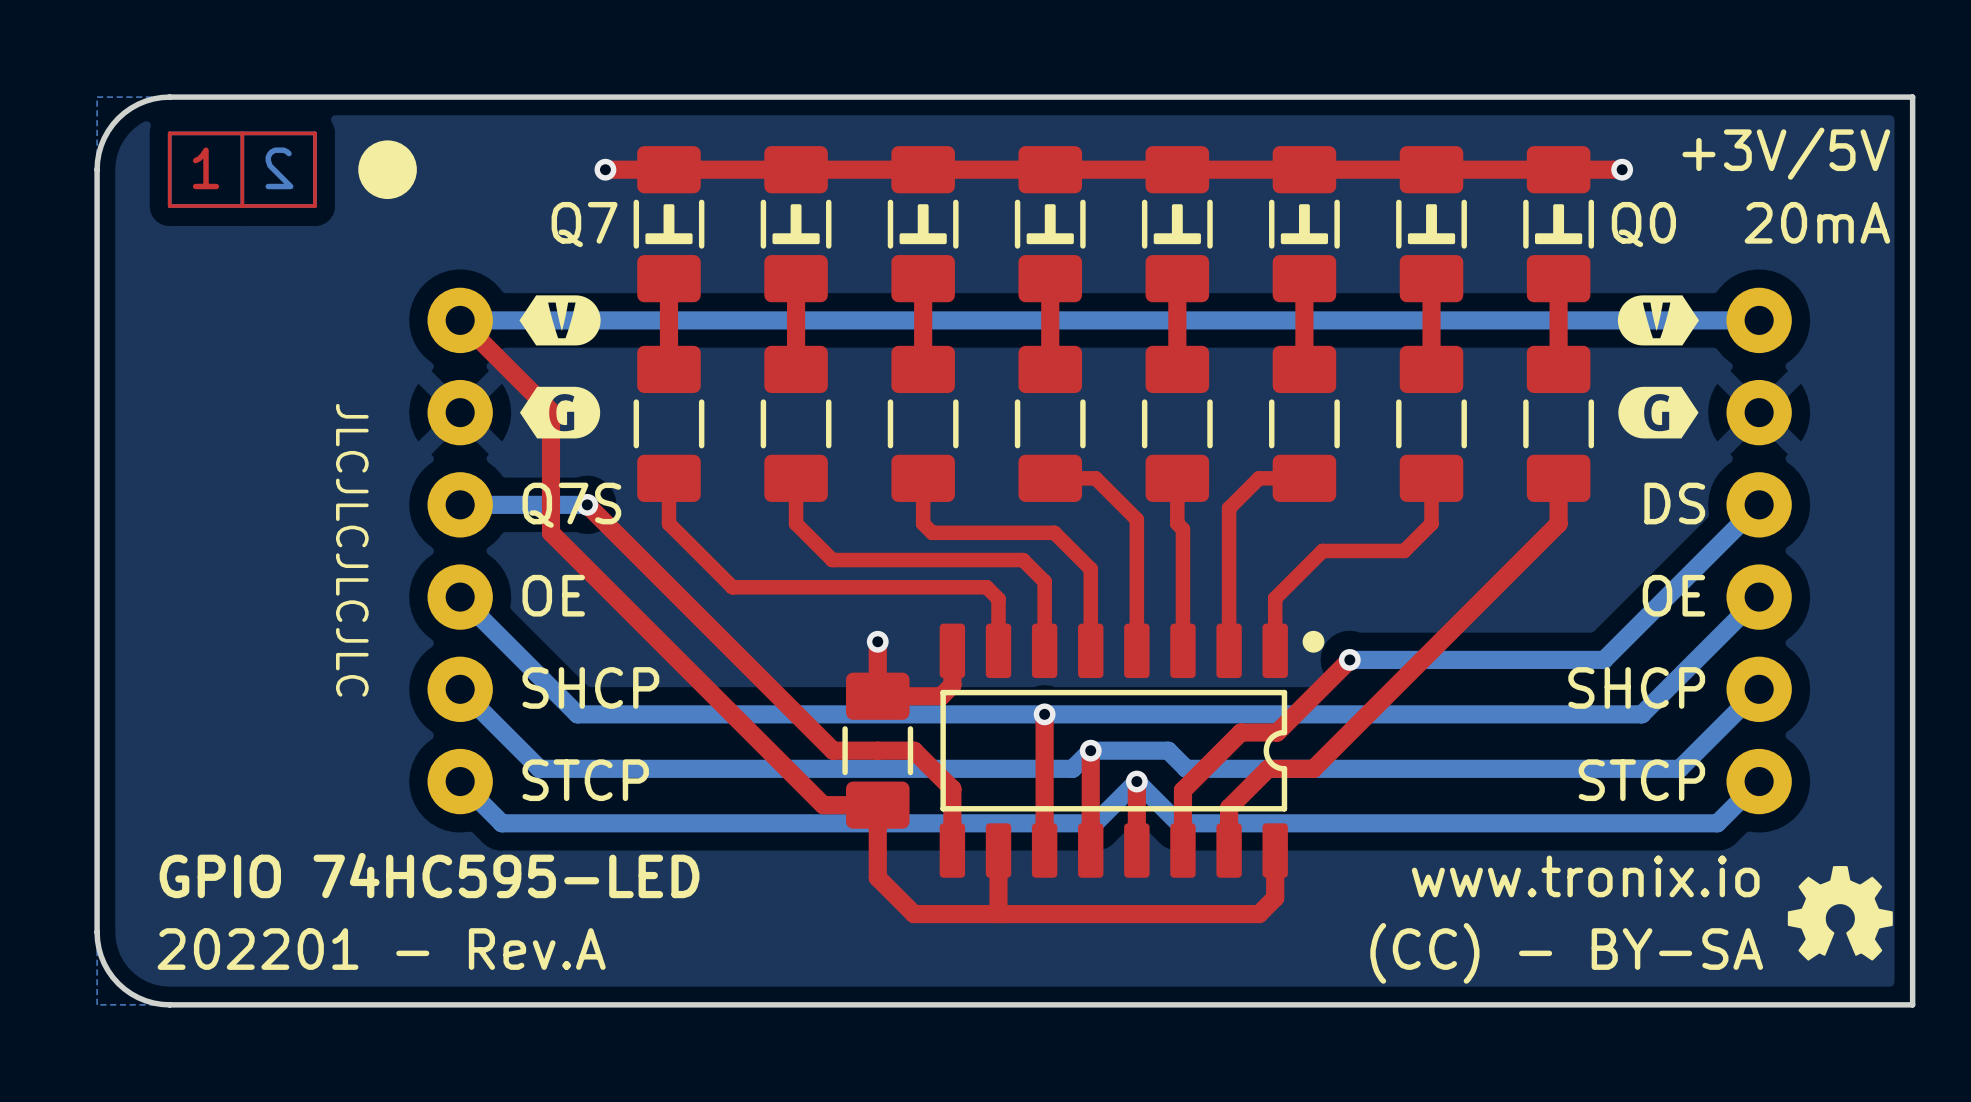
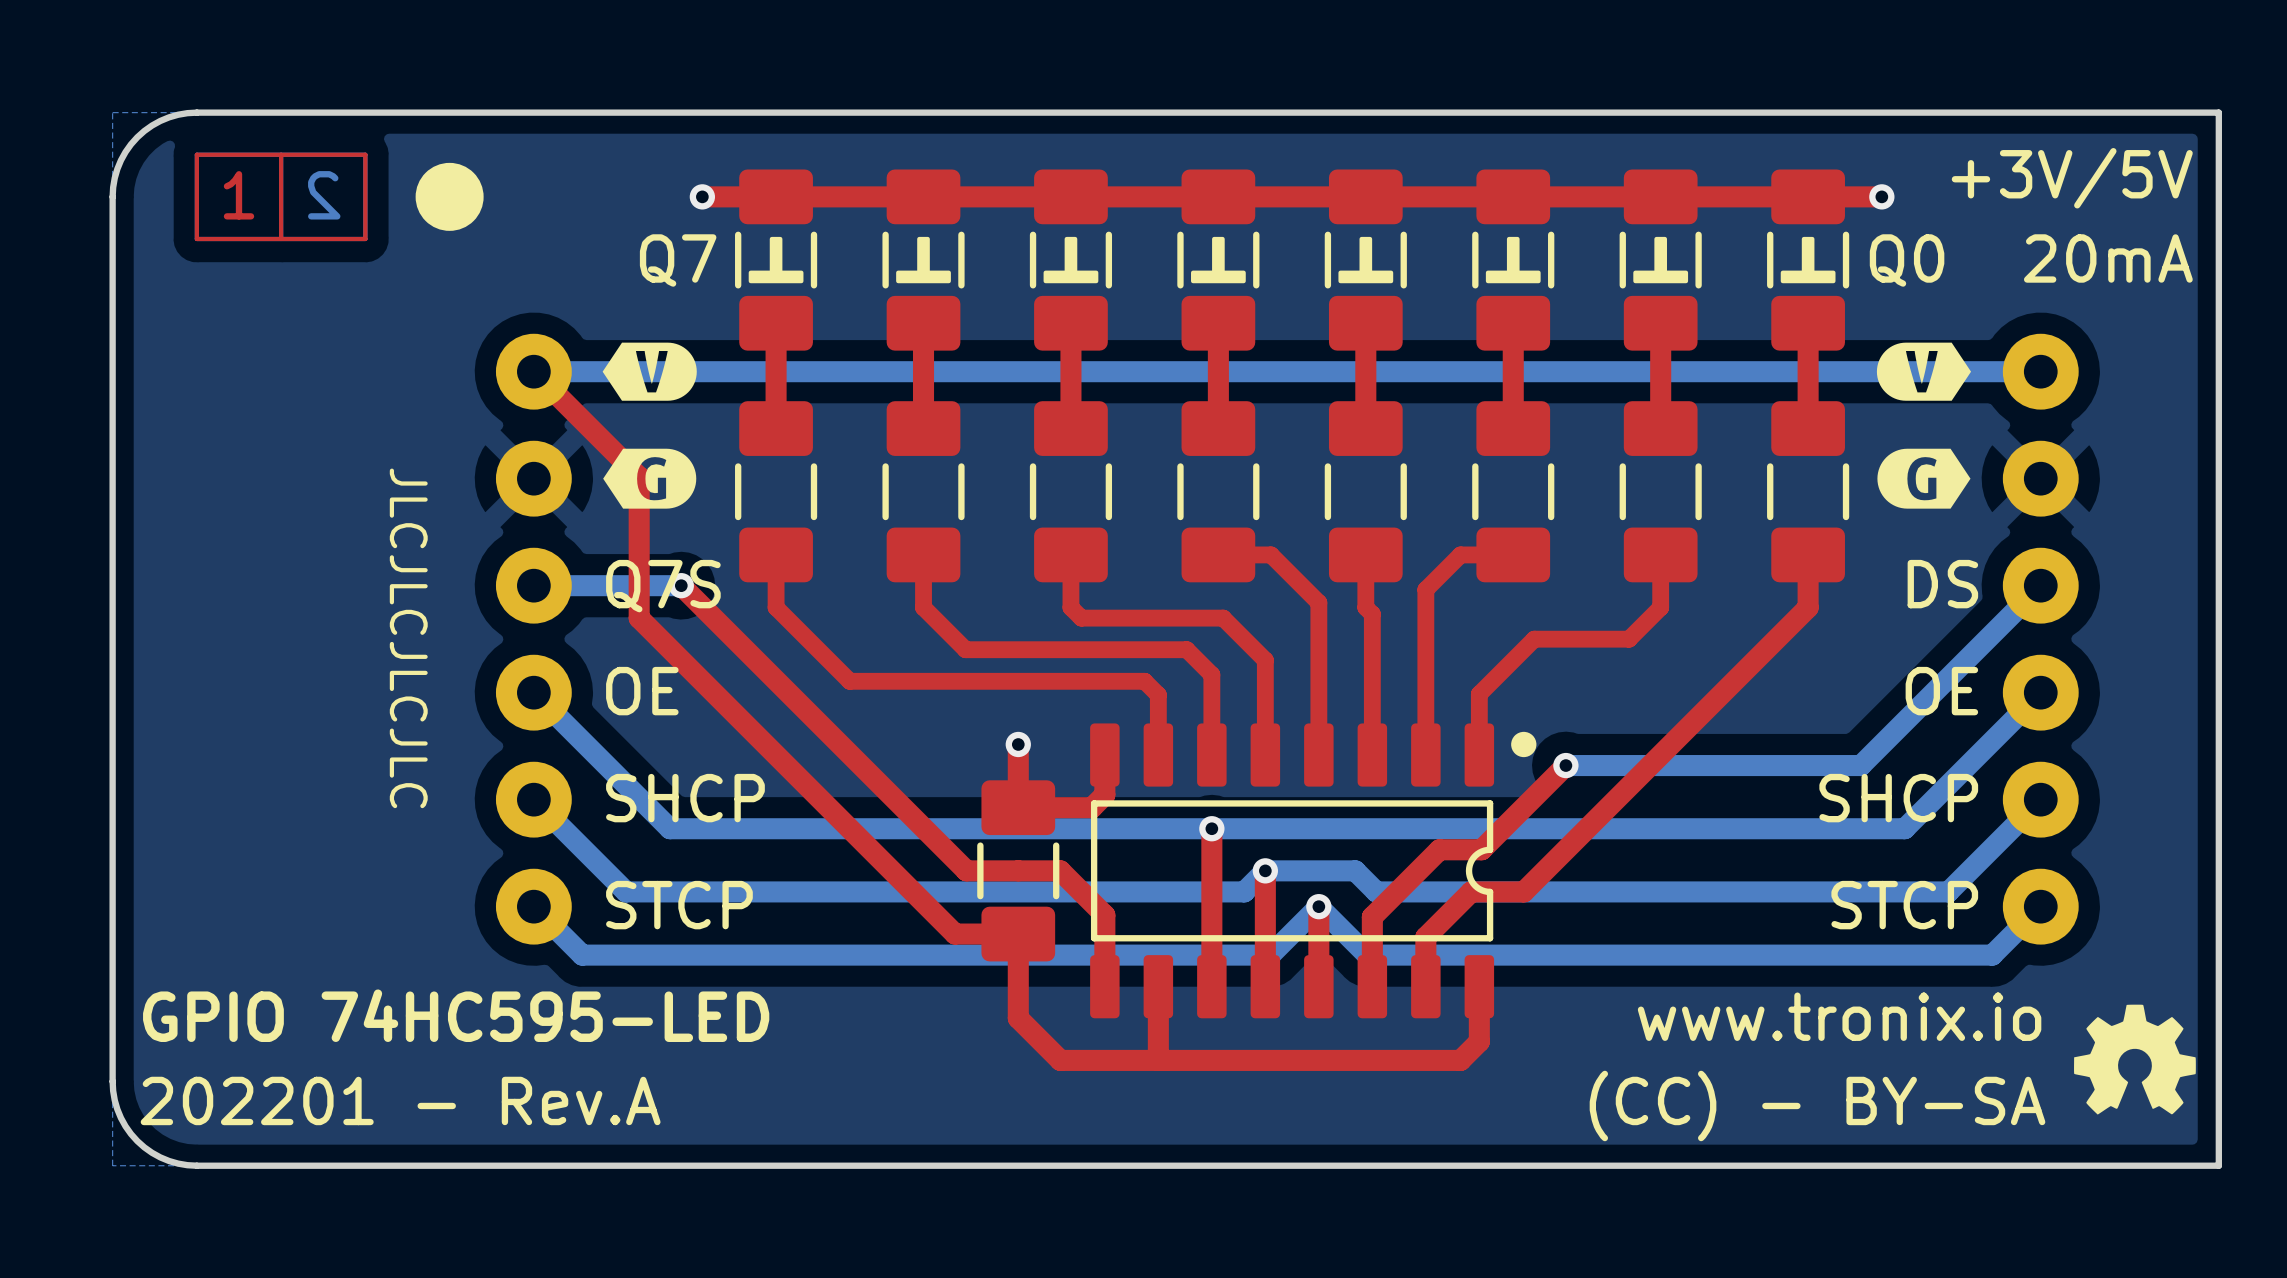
text position: GPIO 74HC595-LED (429, 875) -> GPIO 74HC595-LED (456, 1015)
text position: 202201 - Rev.A (381, 949) -> 202201 - Rev.A (400, 1100)

